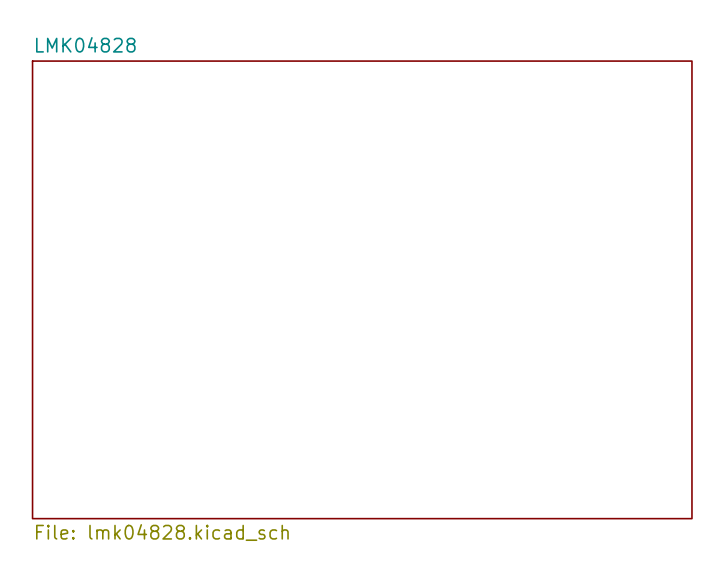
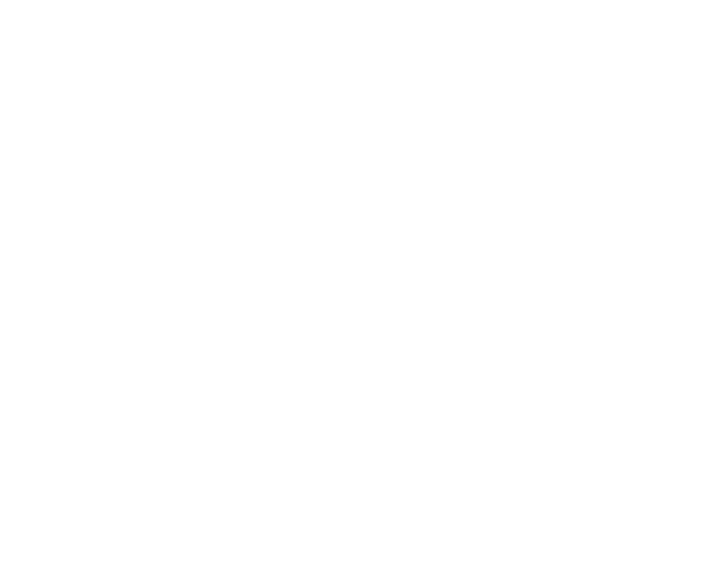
sheet LMK04828: File: lmk04828.kicad_sch (362, 289) -> none

